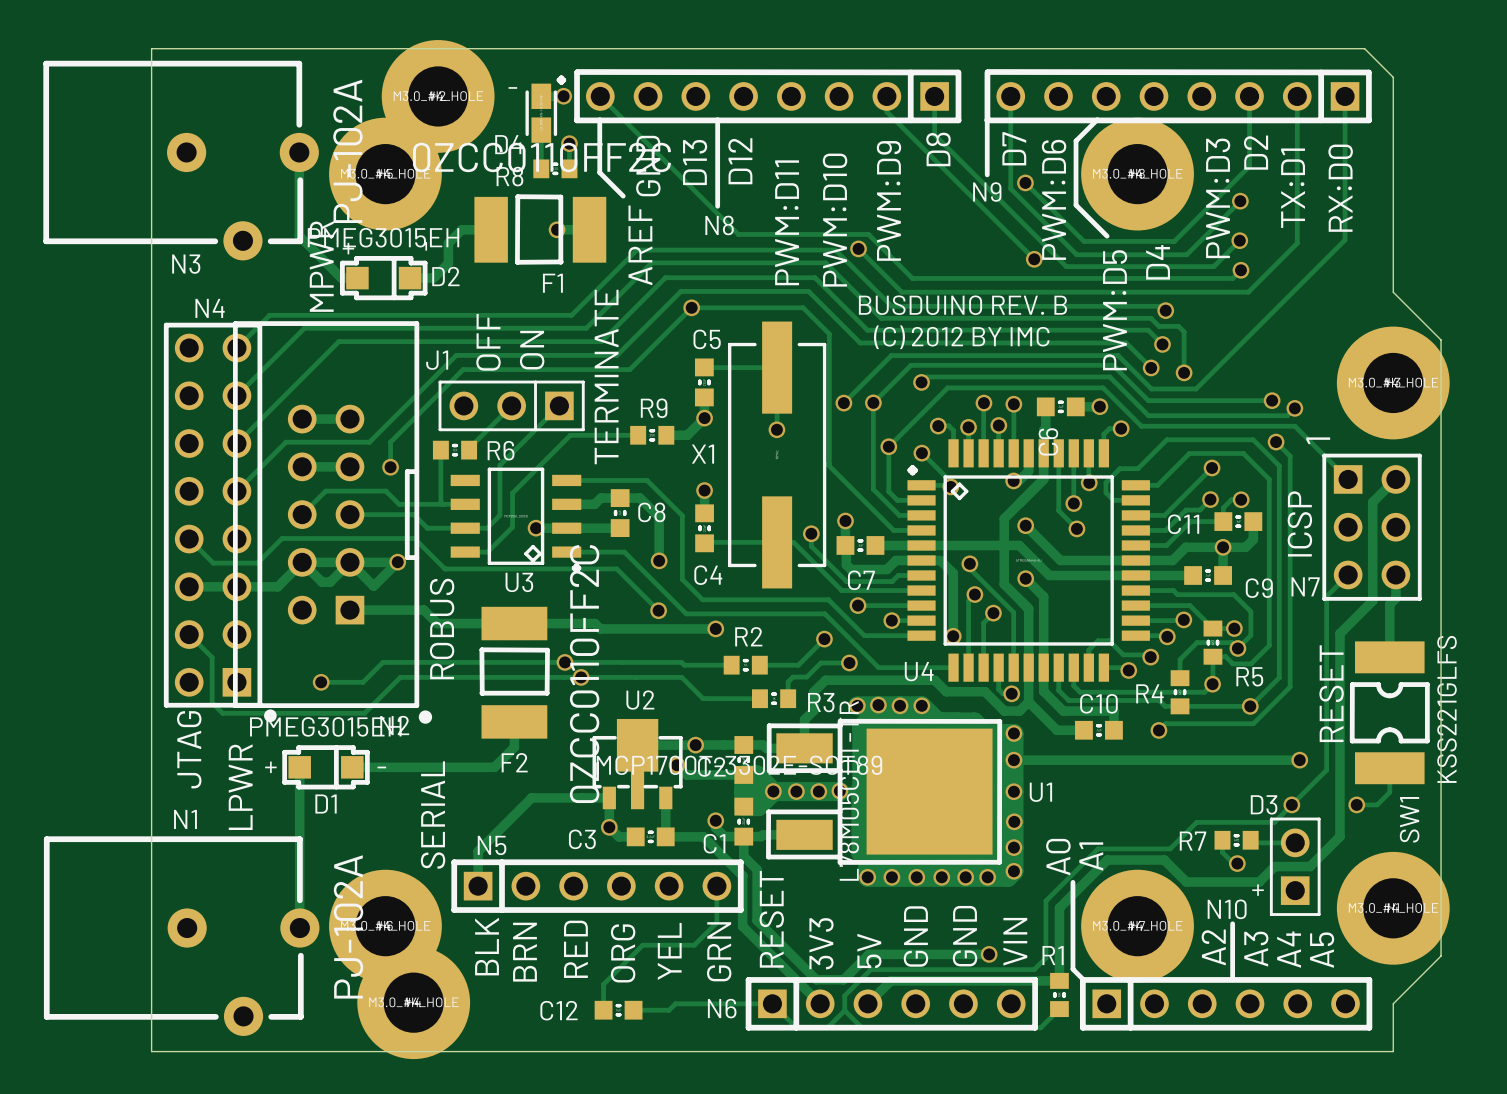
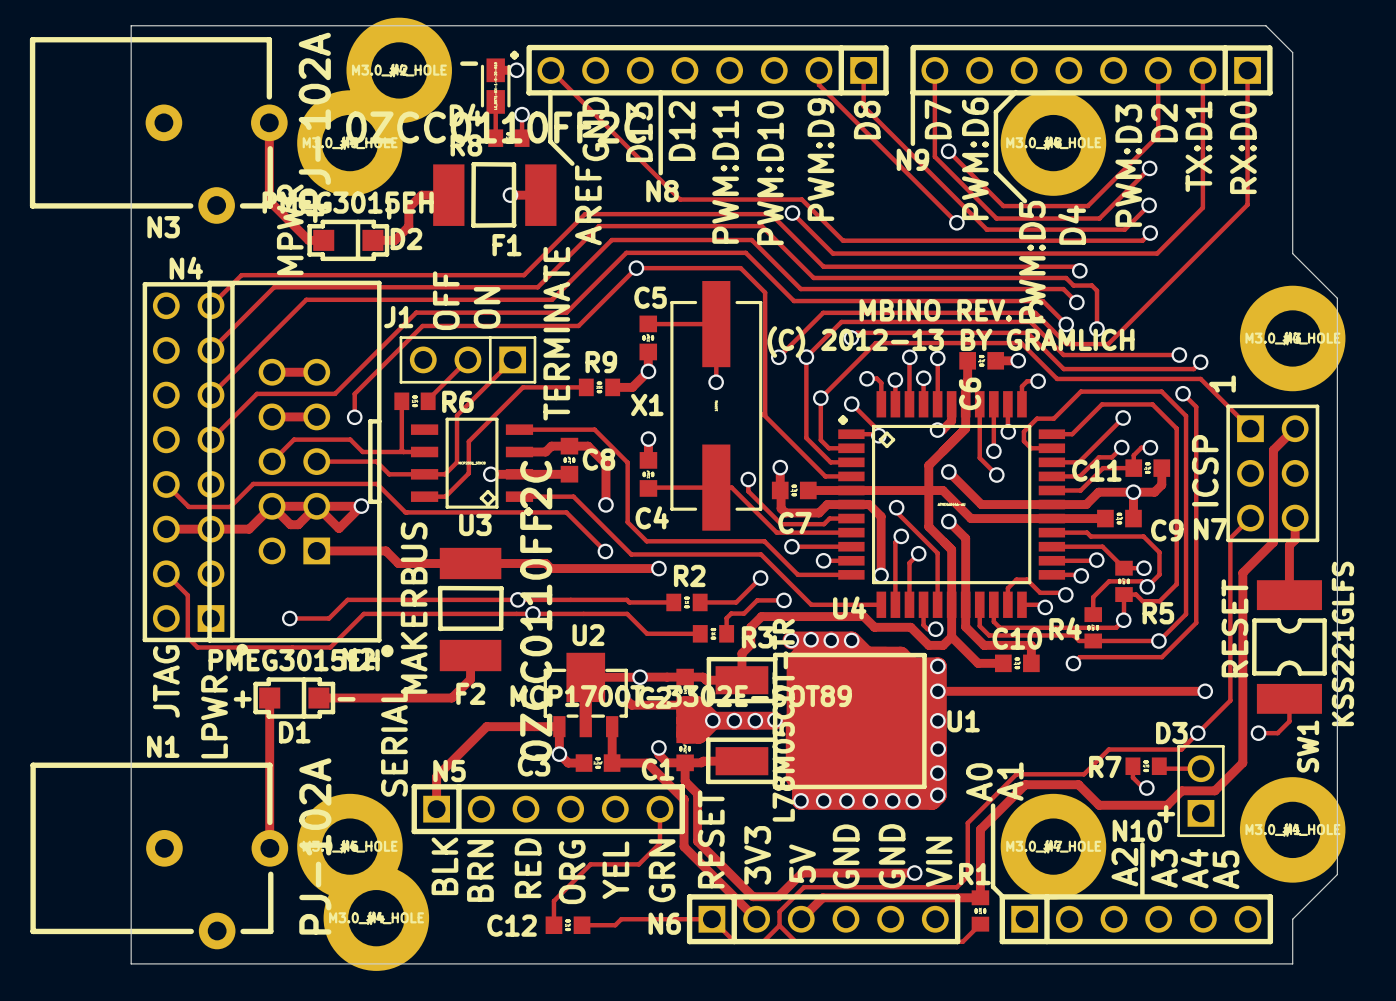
text: BUSDUINO REV. B (962, 305) -> none
text: (C) 2012 BY IMC (961, 337) -> none
text: none -> MBINO REV. C (951, 310)
text: none -> (C) 2012-13 BY GRAMLICH (951, 342)
text: ROBUS (442, 629) -> MAKERBUS (414, 608)

